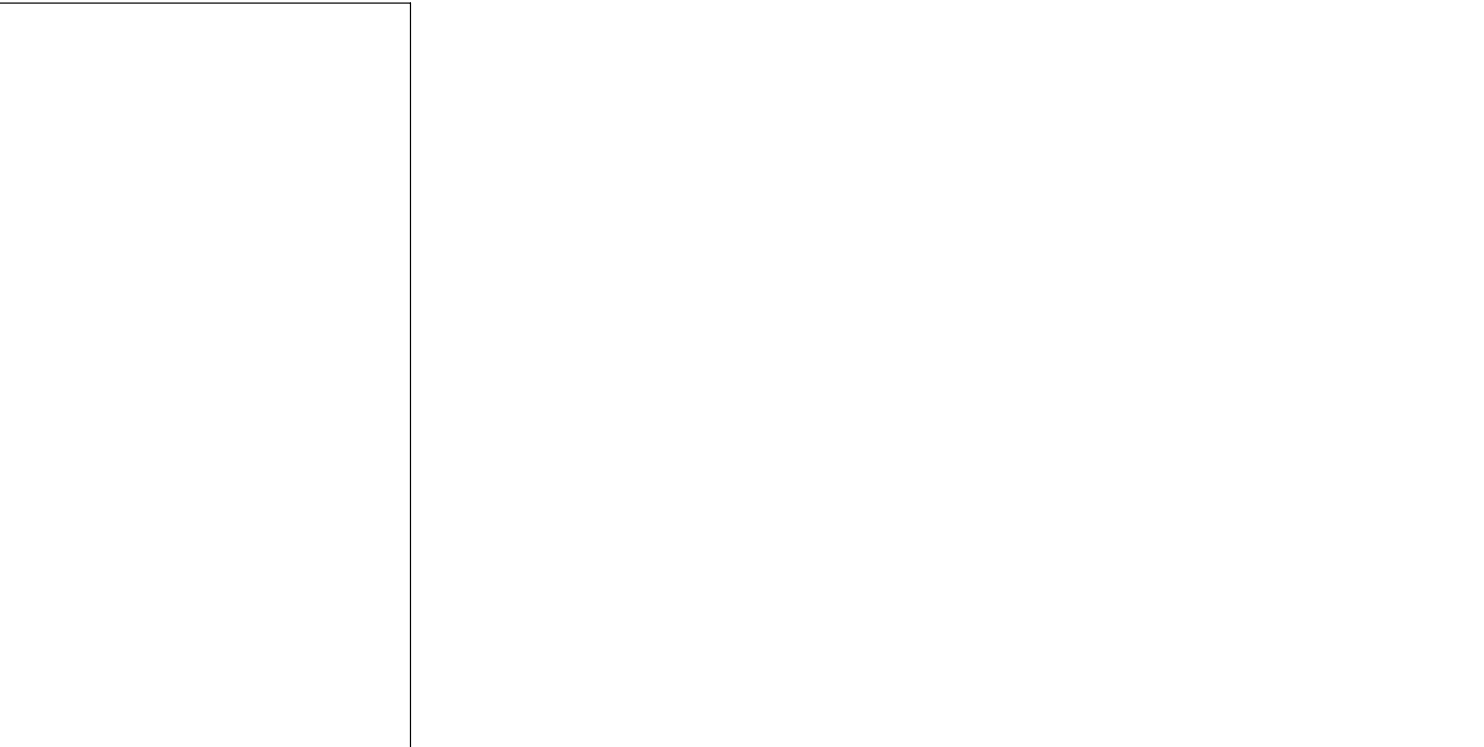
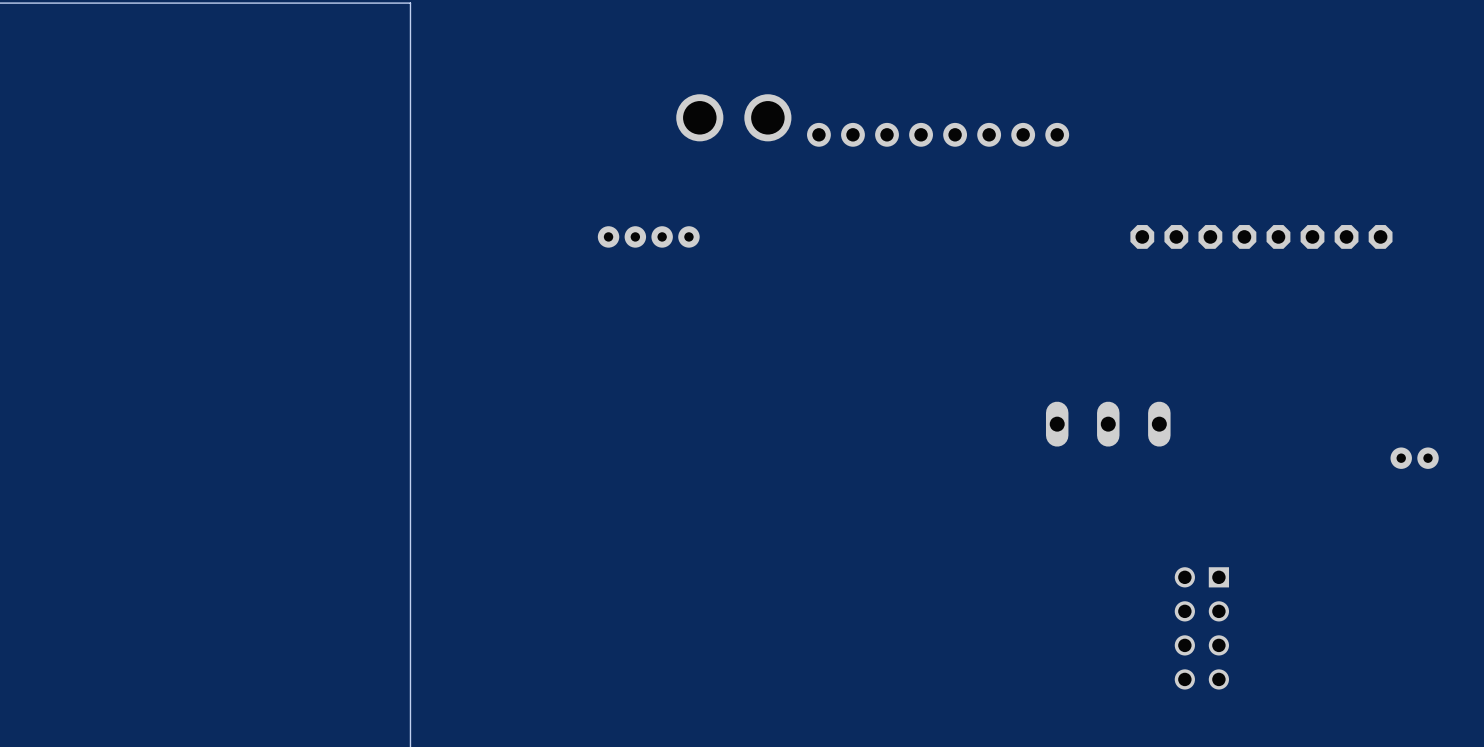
part: none -> (699, 117)
part: none -> (767, 117)
part: none -> (938, 134)
part: none -> (648, 236)
part: none -> (1261, 236)
part: none -> (1108, 424)
part: none -> (1414, 458)
part: none -> (1201, 628)

